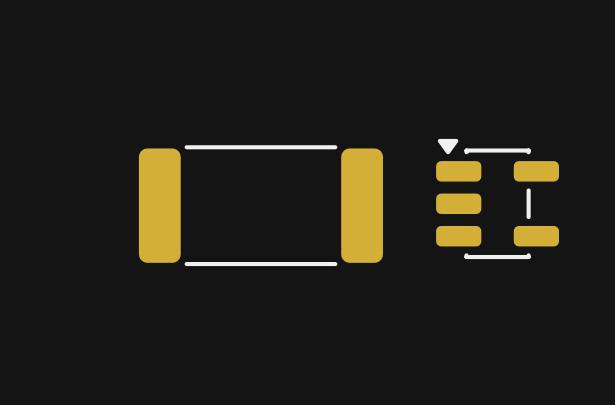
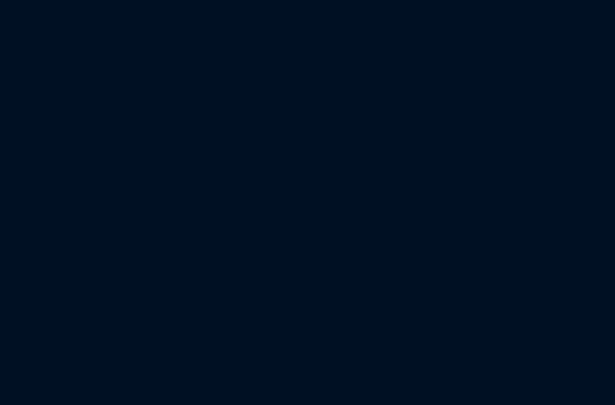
part: (497, 198) -> none
part: (260, 205) -> none

